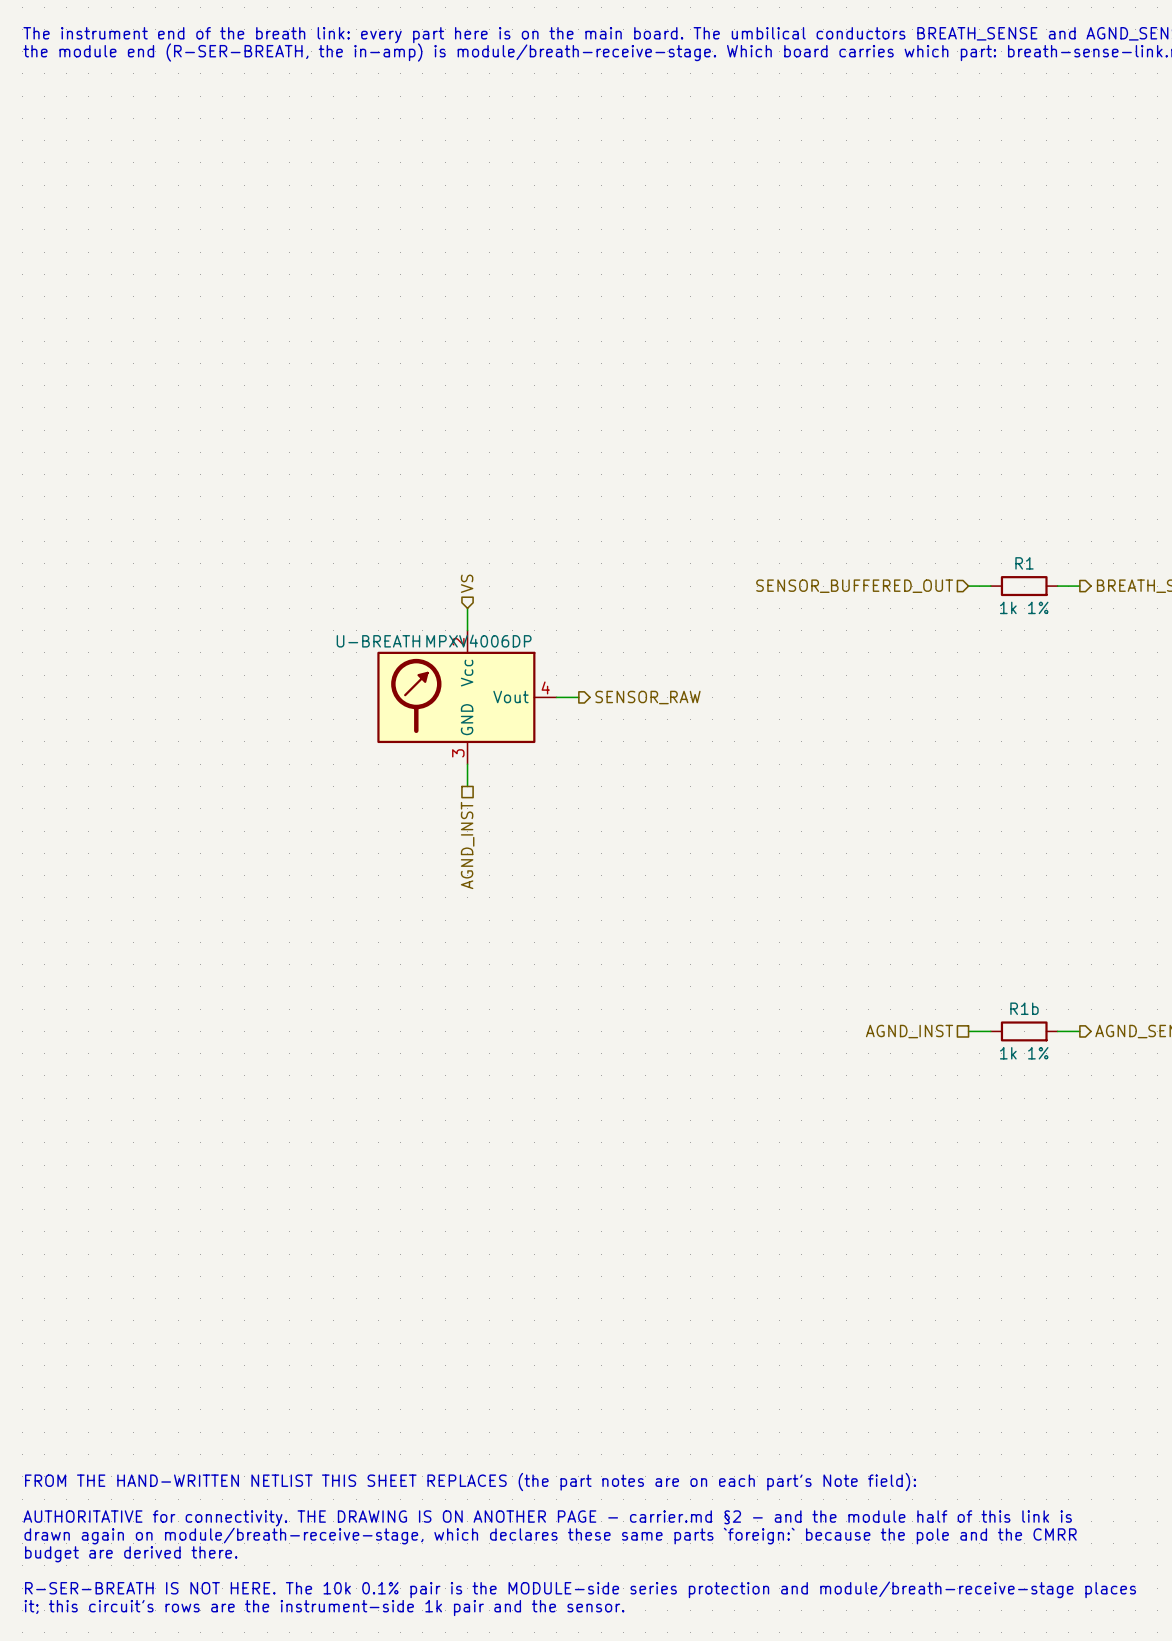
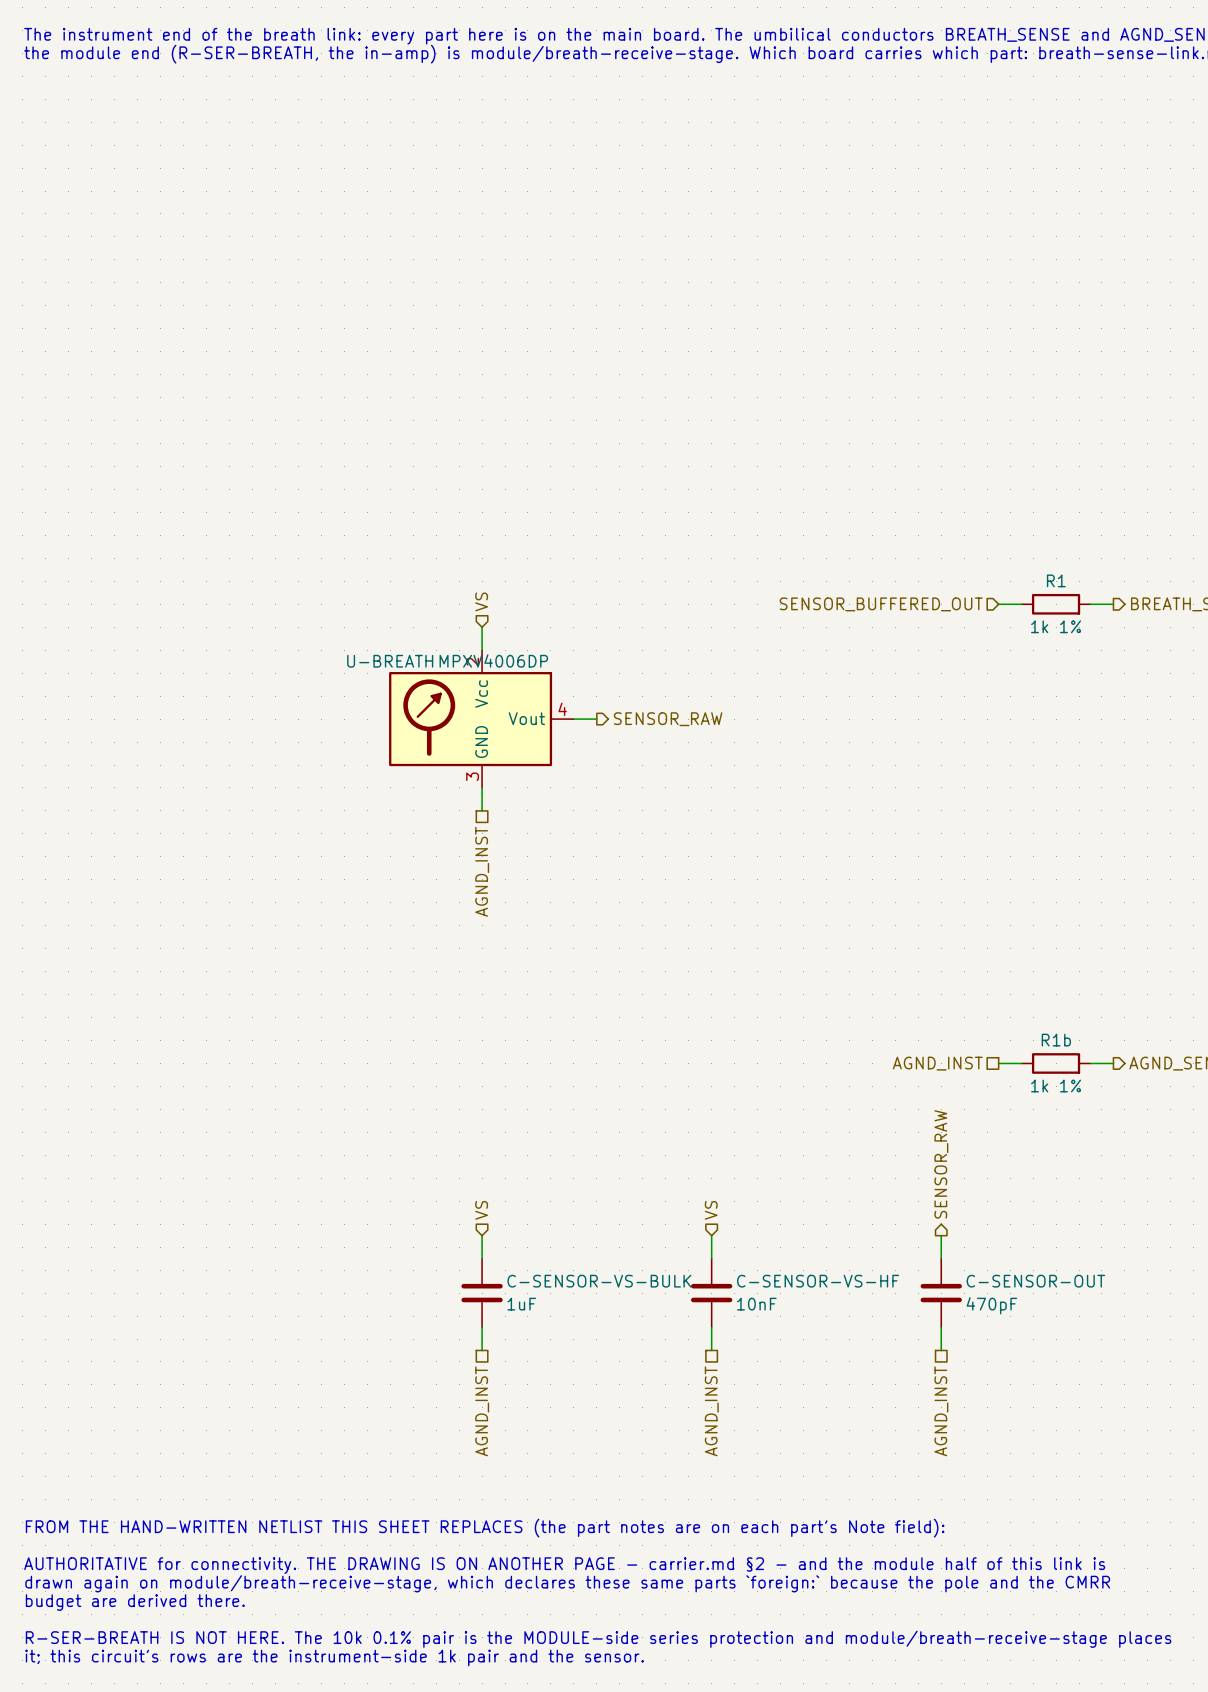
hierarchical label: none -> SENSOR_RAW (941, 1164)
hierarchical label: none -> VS (481, 1210)
hierarchical label: none -> VS (711, 1210)
wire: none -> (482, 1235) (482, 1258)
wire: none -> (711, 1235) (711, 1258)
wire: none -> (941, 1235) (941, 1258)
C-SENSOR-VS-BULK: none -> 1uF (482, 1293)
C-SENSOR-VS-HF: none -> 10nF (711, 1293)
C-SENSOR-OUT: none -> 470pF (941, 1293)
wire: none -> (482, 1327) (482, 1350)
wire: none -> (711, 1327) (711, 1350)
wire: none -> (941, 1327) (941, 1350)
hierarchical label: none -> AGND_INST (482, 1411)
hierarchical label: none -> AGND_INST (711, 1411)
hierarchical label: none -> AGND_INST (941, 1411)

